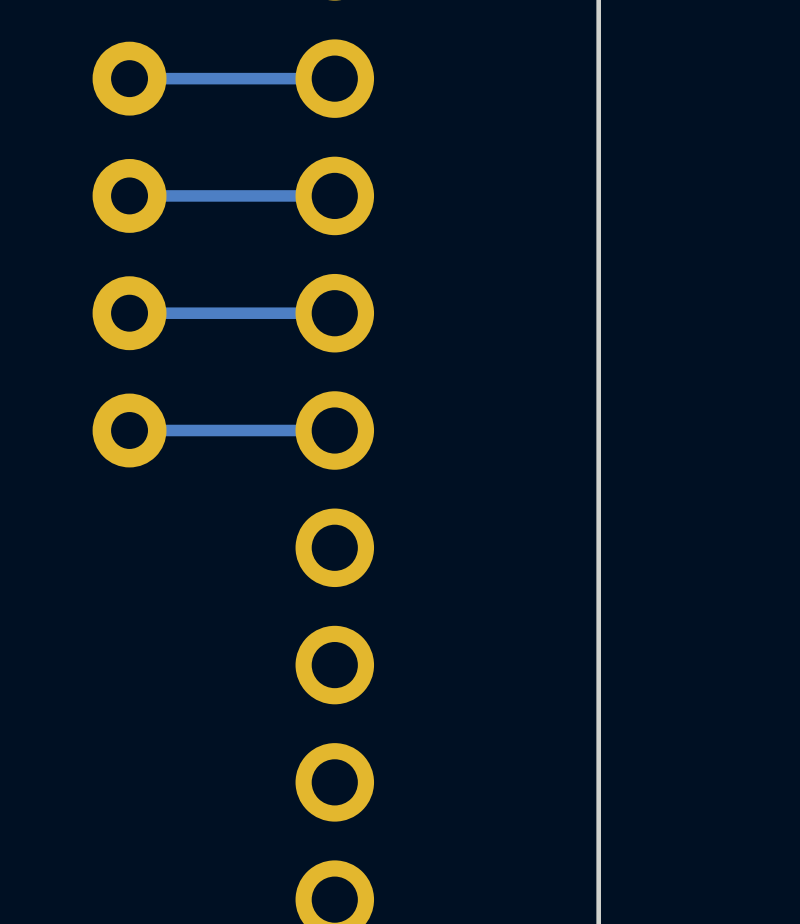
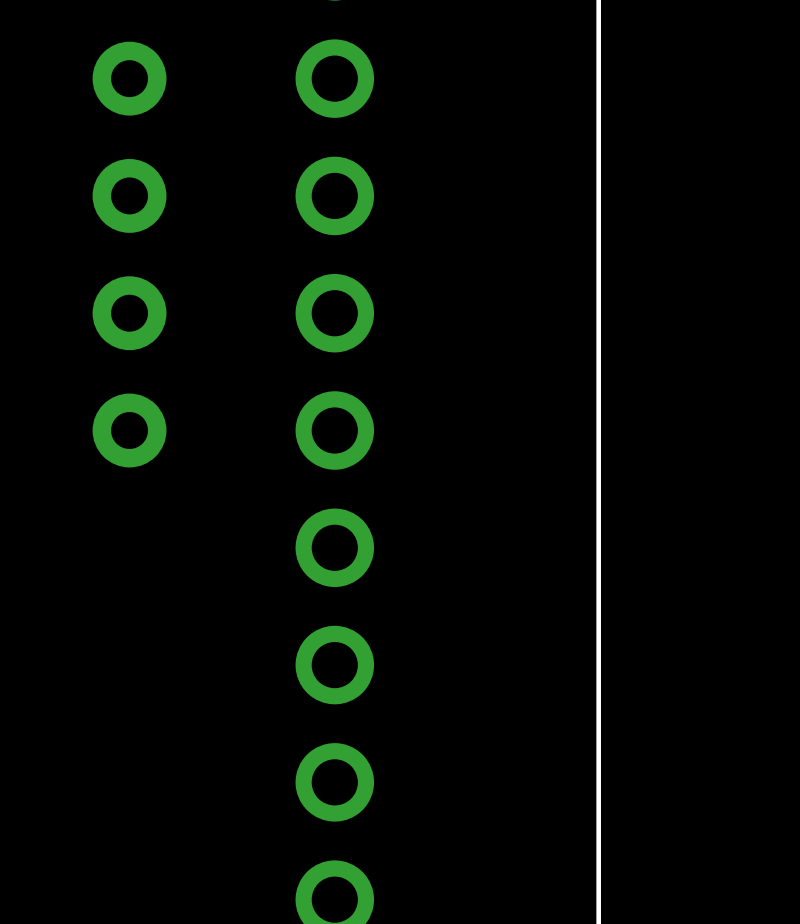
track: (334, 78) (129, 78) -> none
track: (334, 195) (129, 195) -> none
track: (334, 313) (129, 313) -> none
track: (334, 430) (129, 430) -> none

